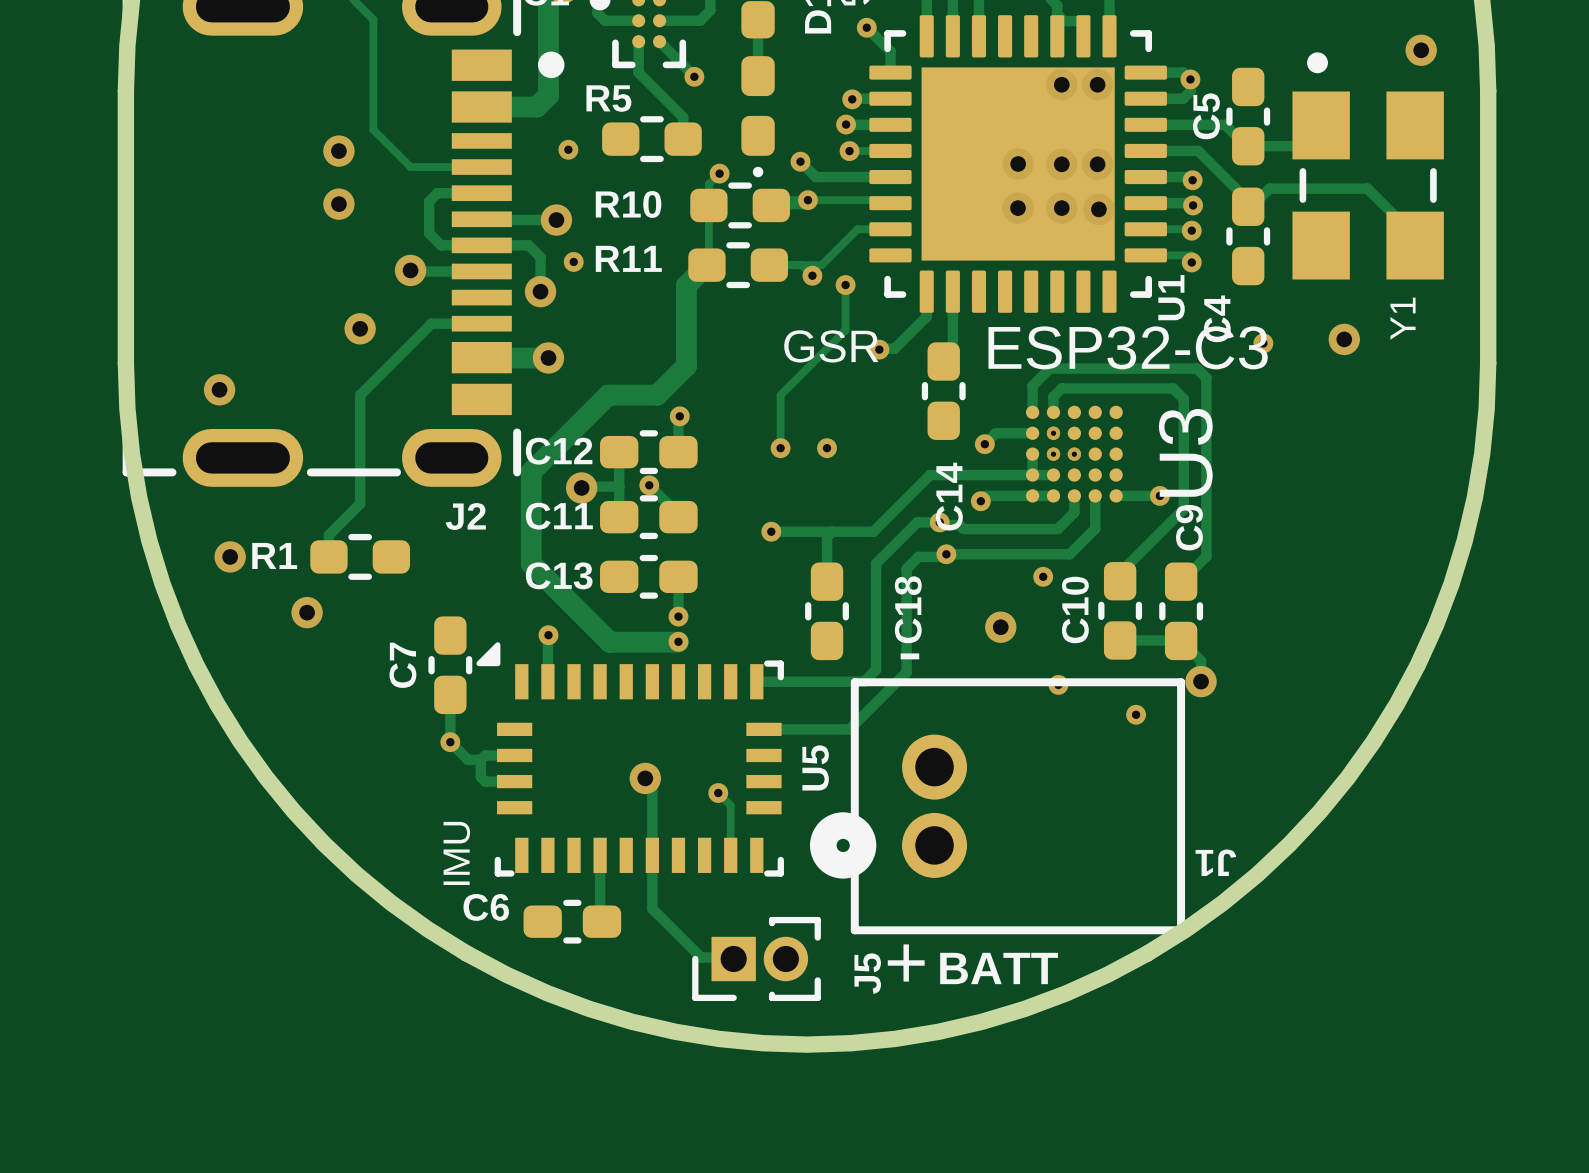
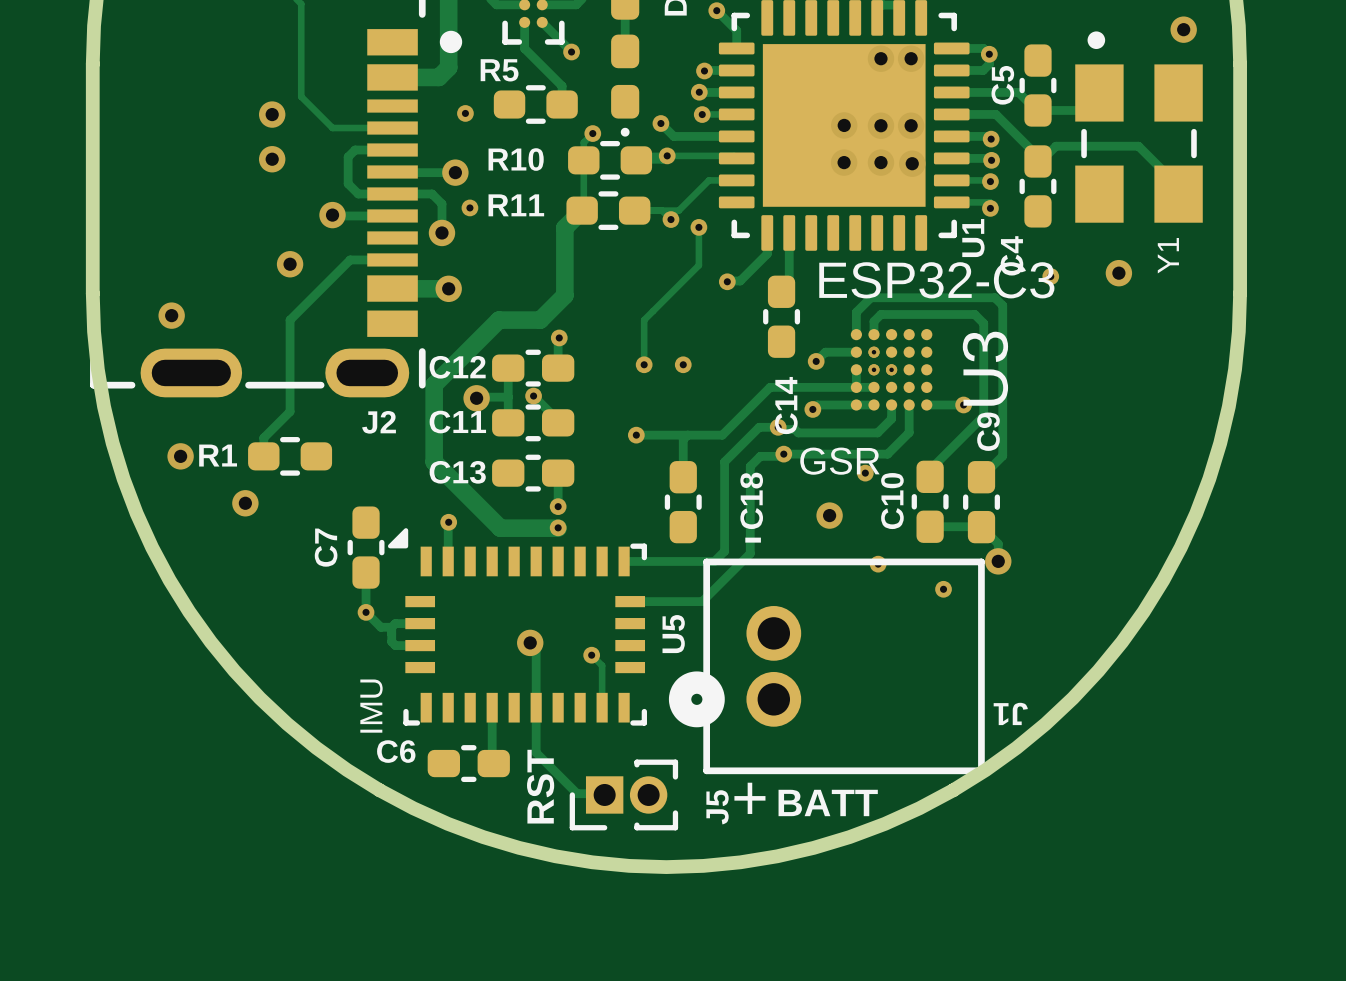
text position: GSR (831, 346) -> GSR (839, 461)
text: none -> RST (540, 786)

